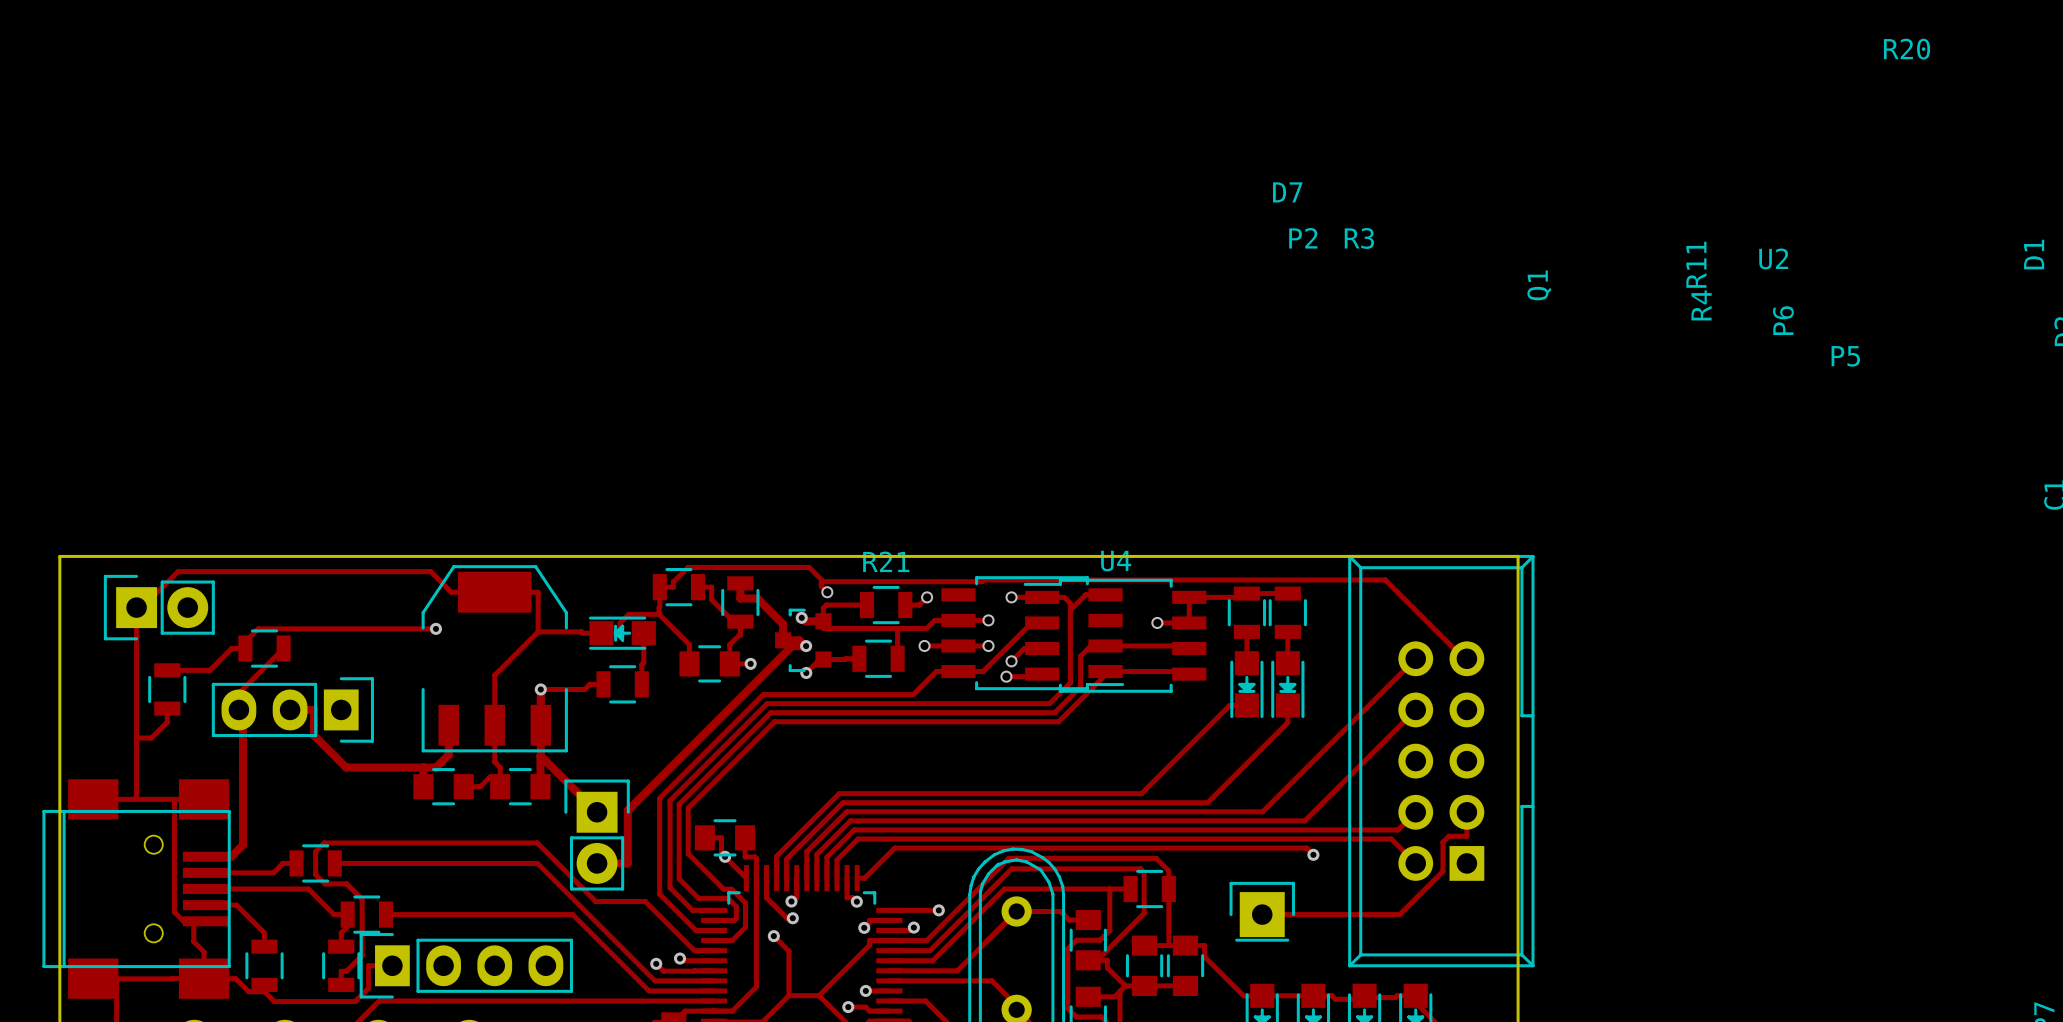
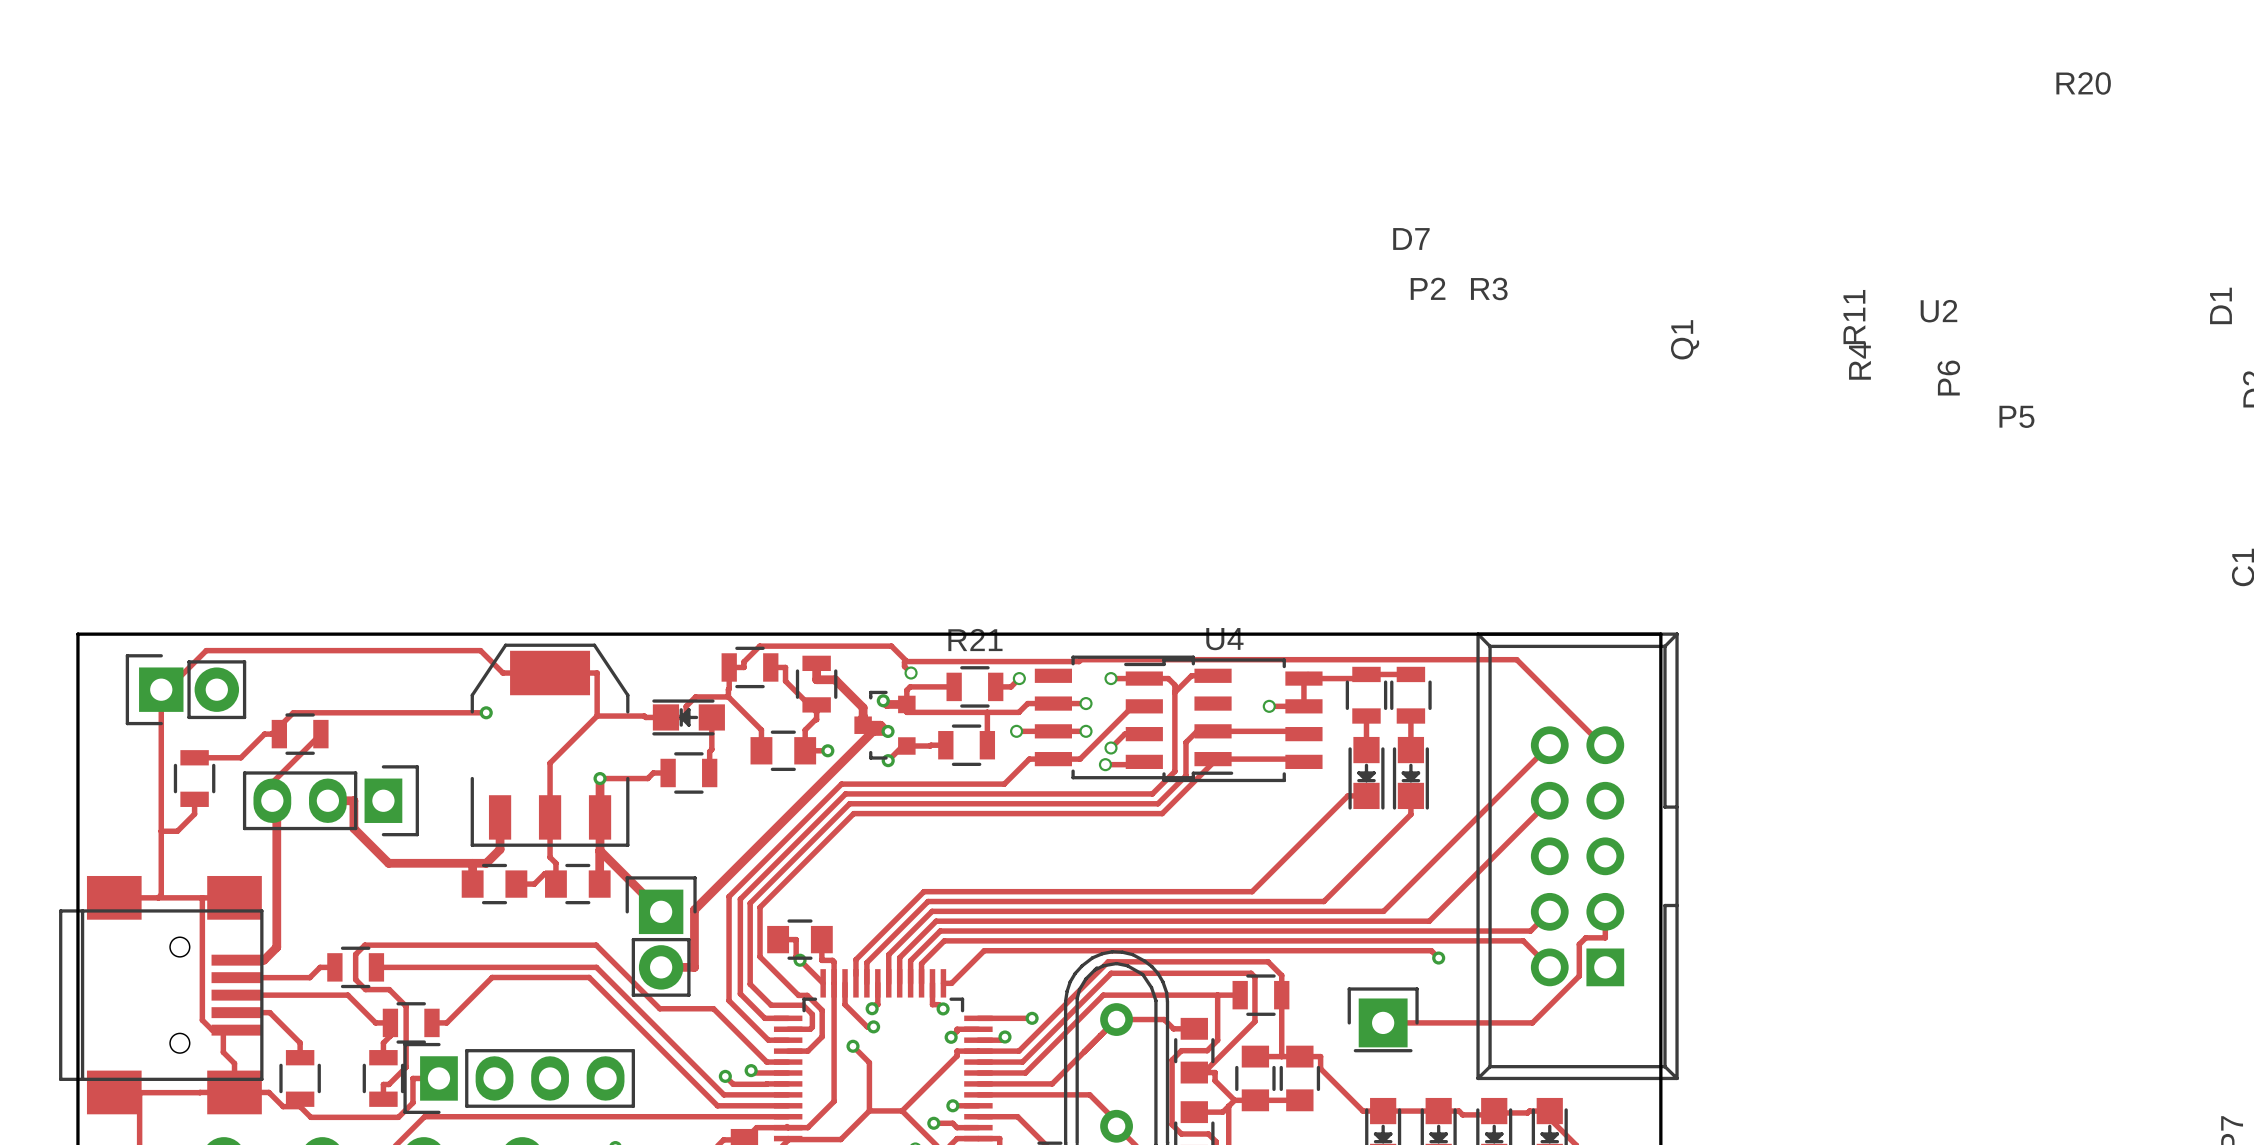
track: (399, 914) (572, 914) -> (446, 1022) (492, 977) (589, 977) (634, 1022)

